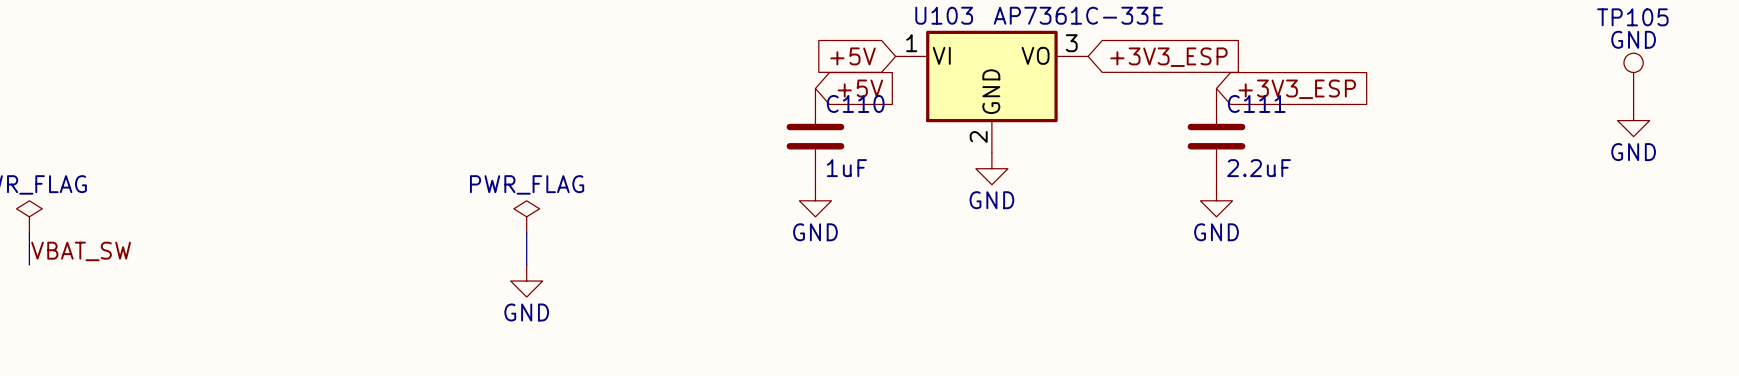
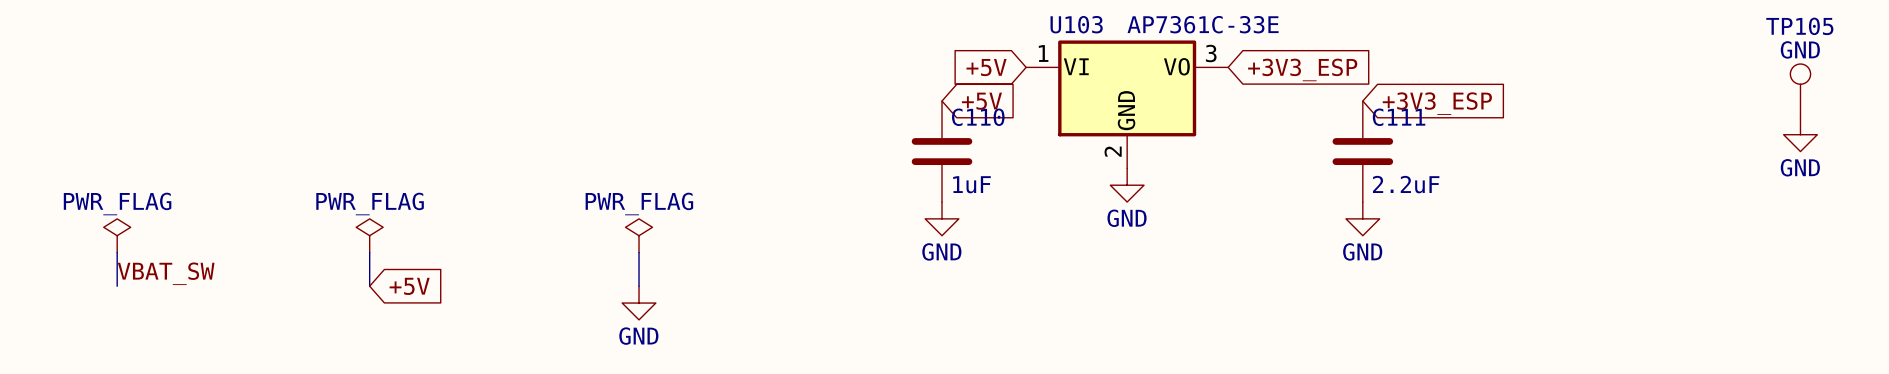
power symbol: none -> PWR_FLAG (369, 235)
wire: none -> (369, 252) (369, 286)
global label: none -> +5V (409, 286)

